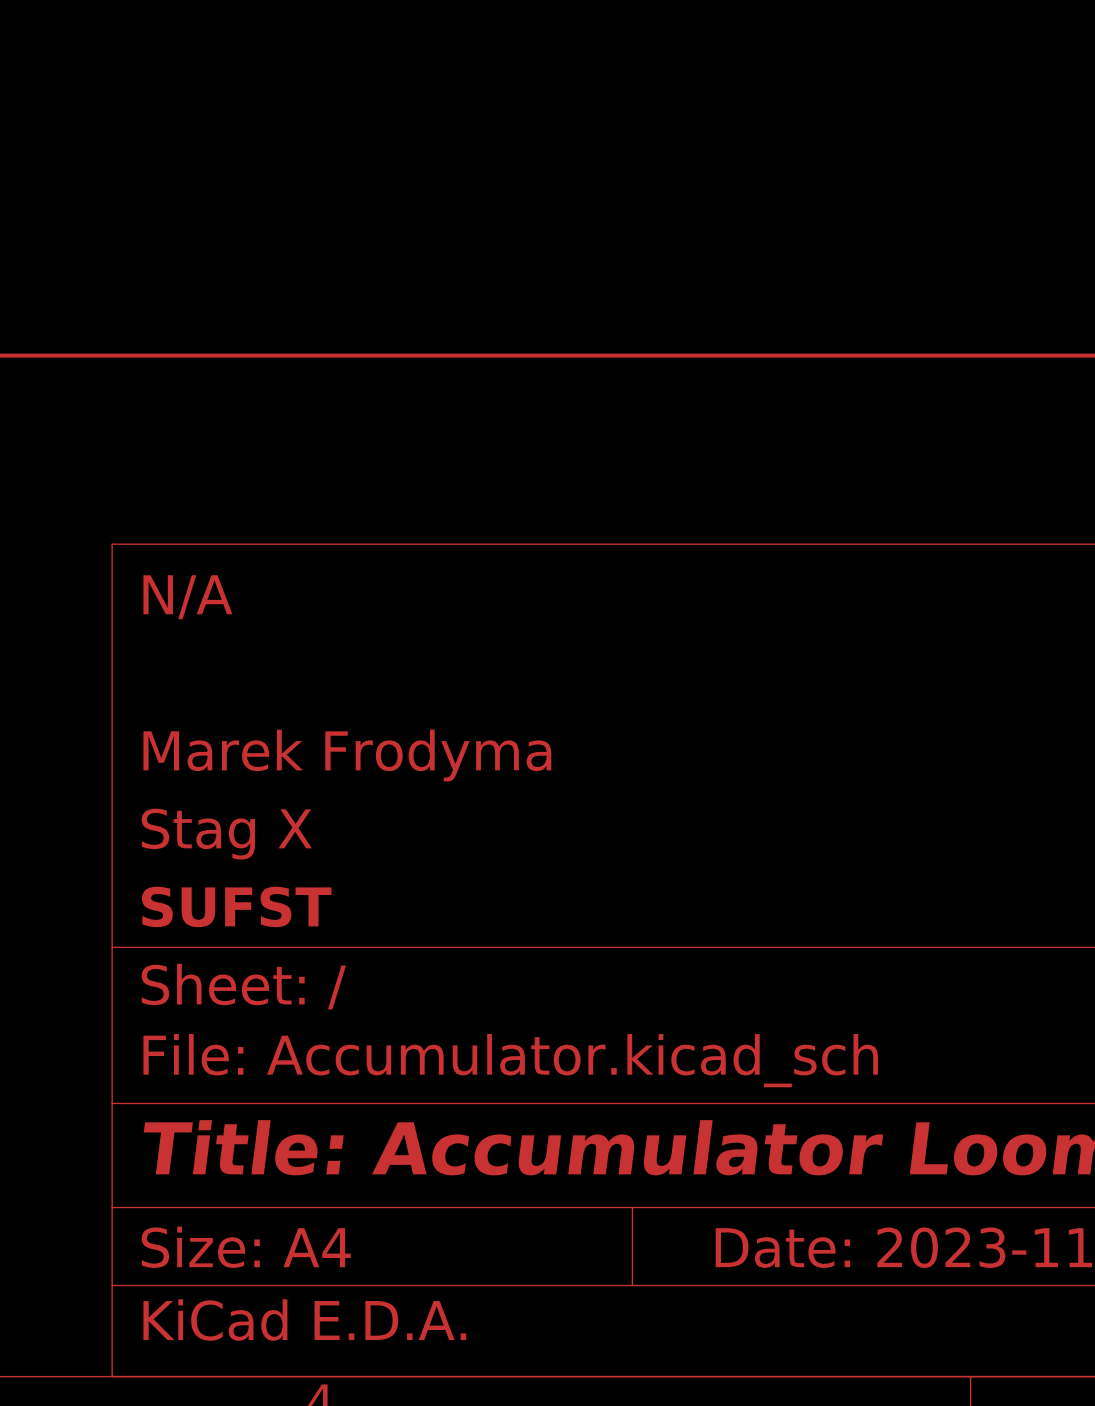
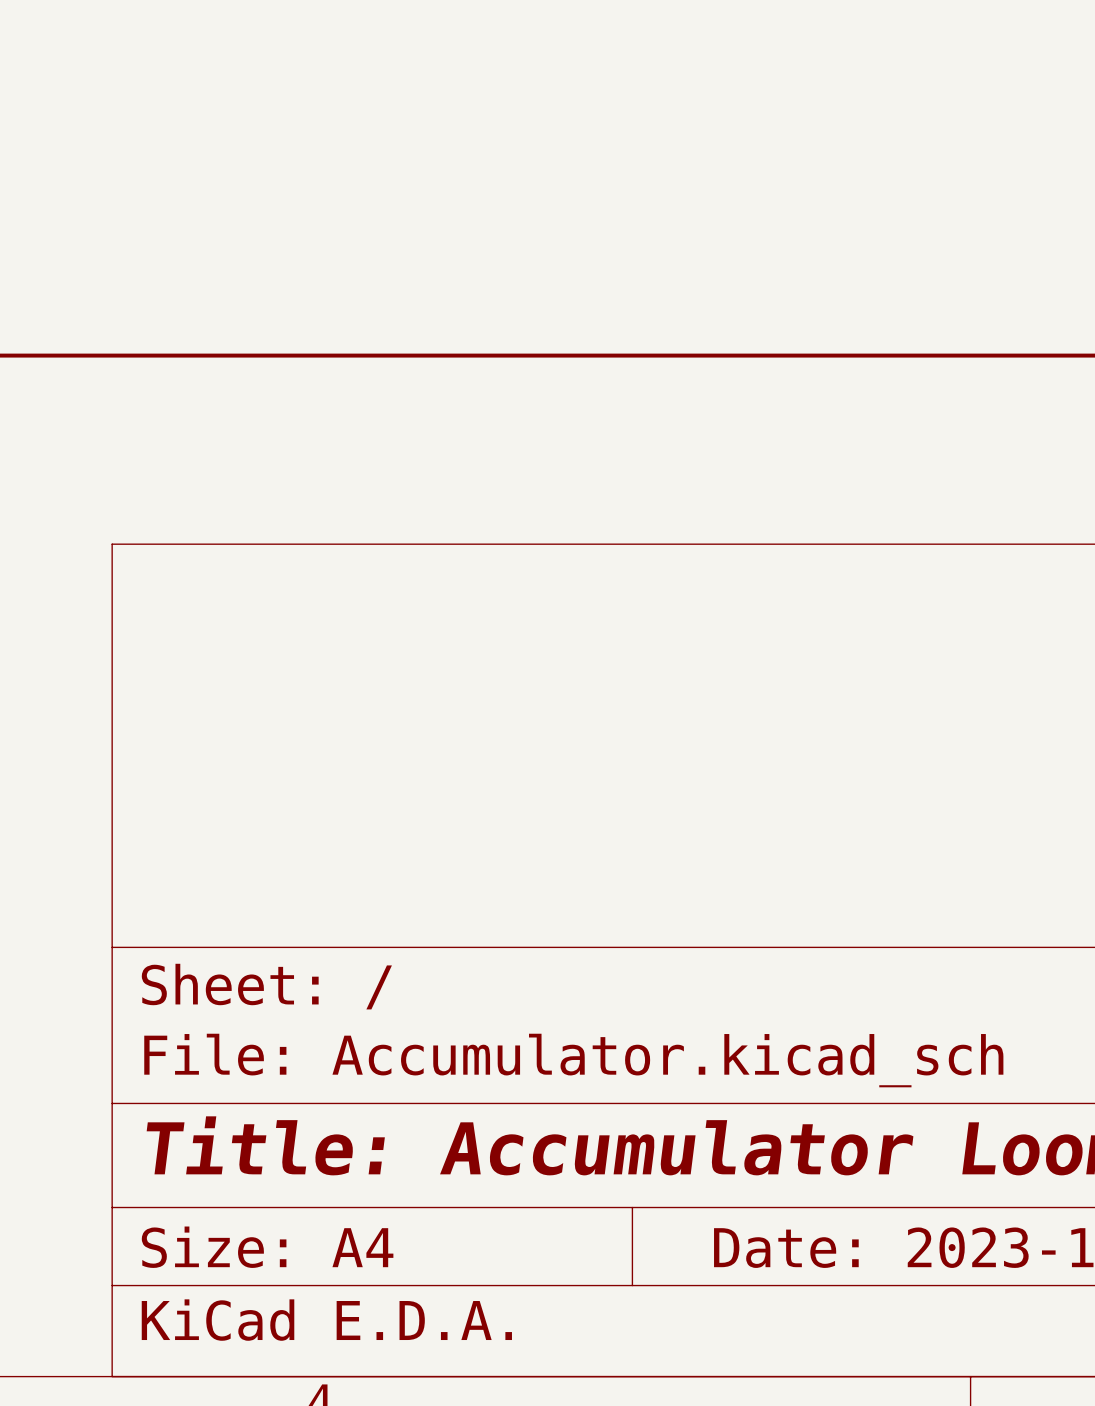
title block: N/A (187, 597) -> none
title block: Marek Frodyma (347, 755) -> none
title block: Stag X (226, 834) -> none
title block: SUFST (236, 906) -> none

